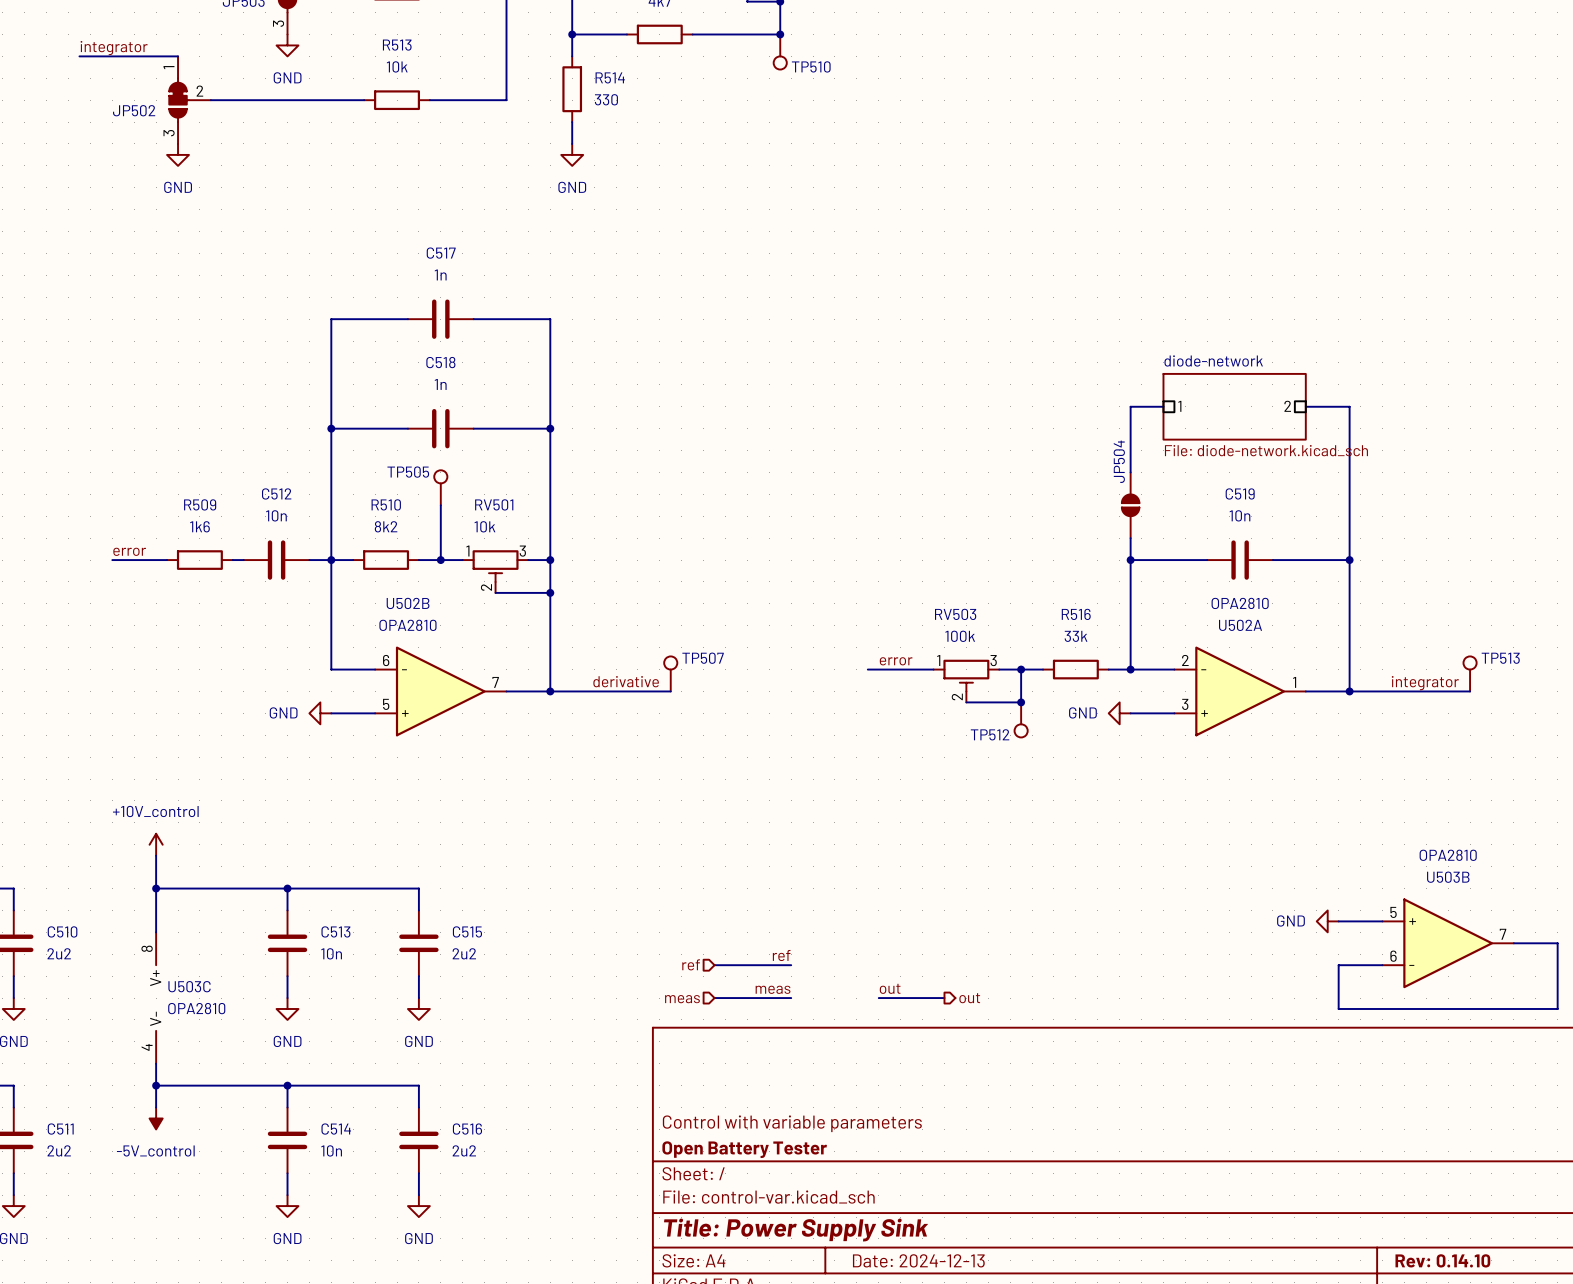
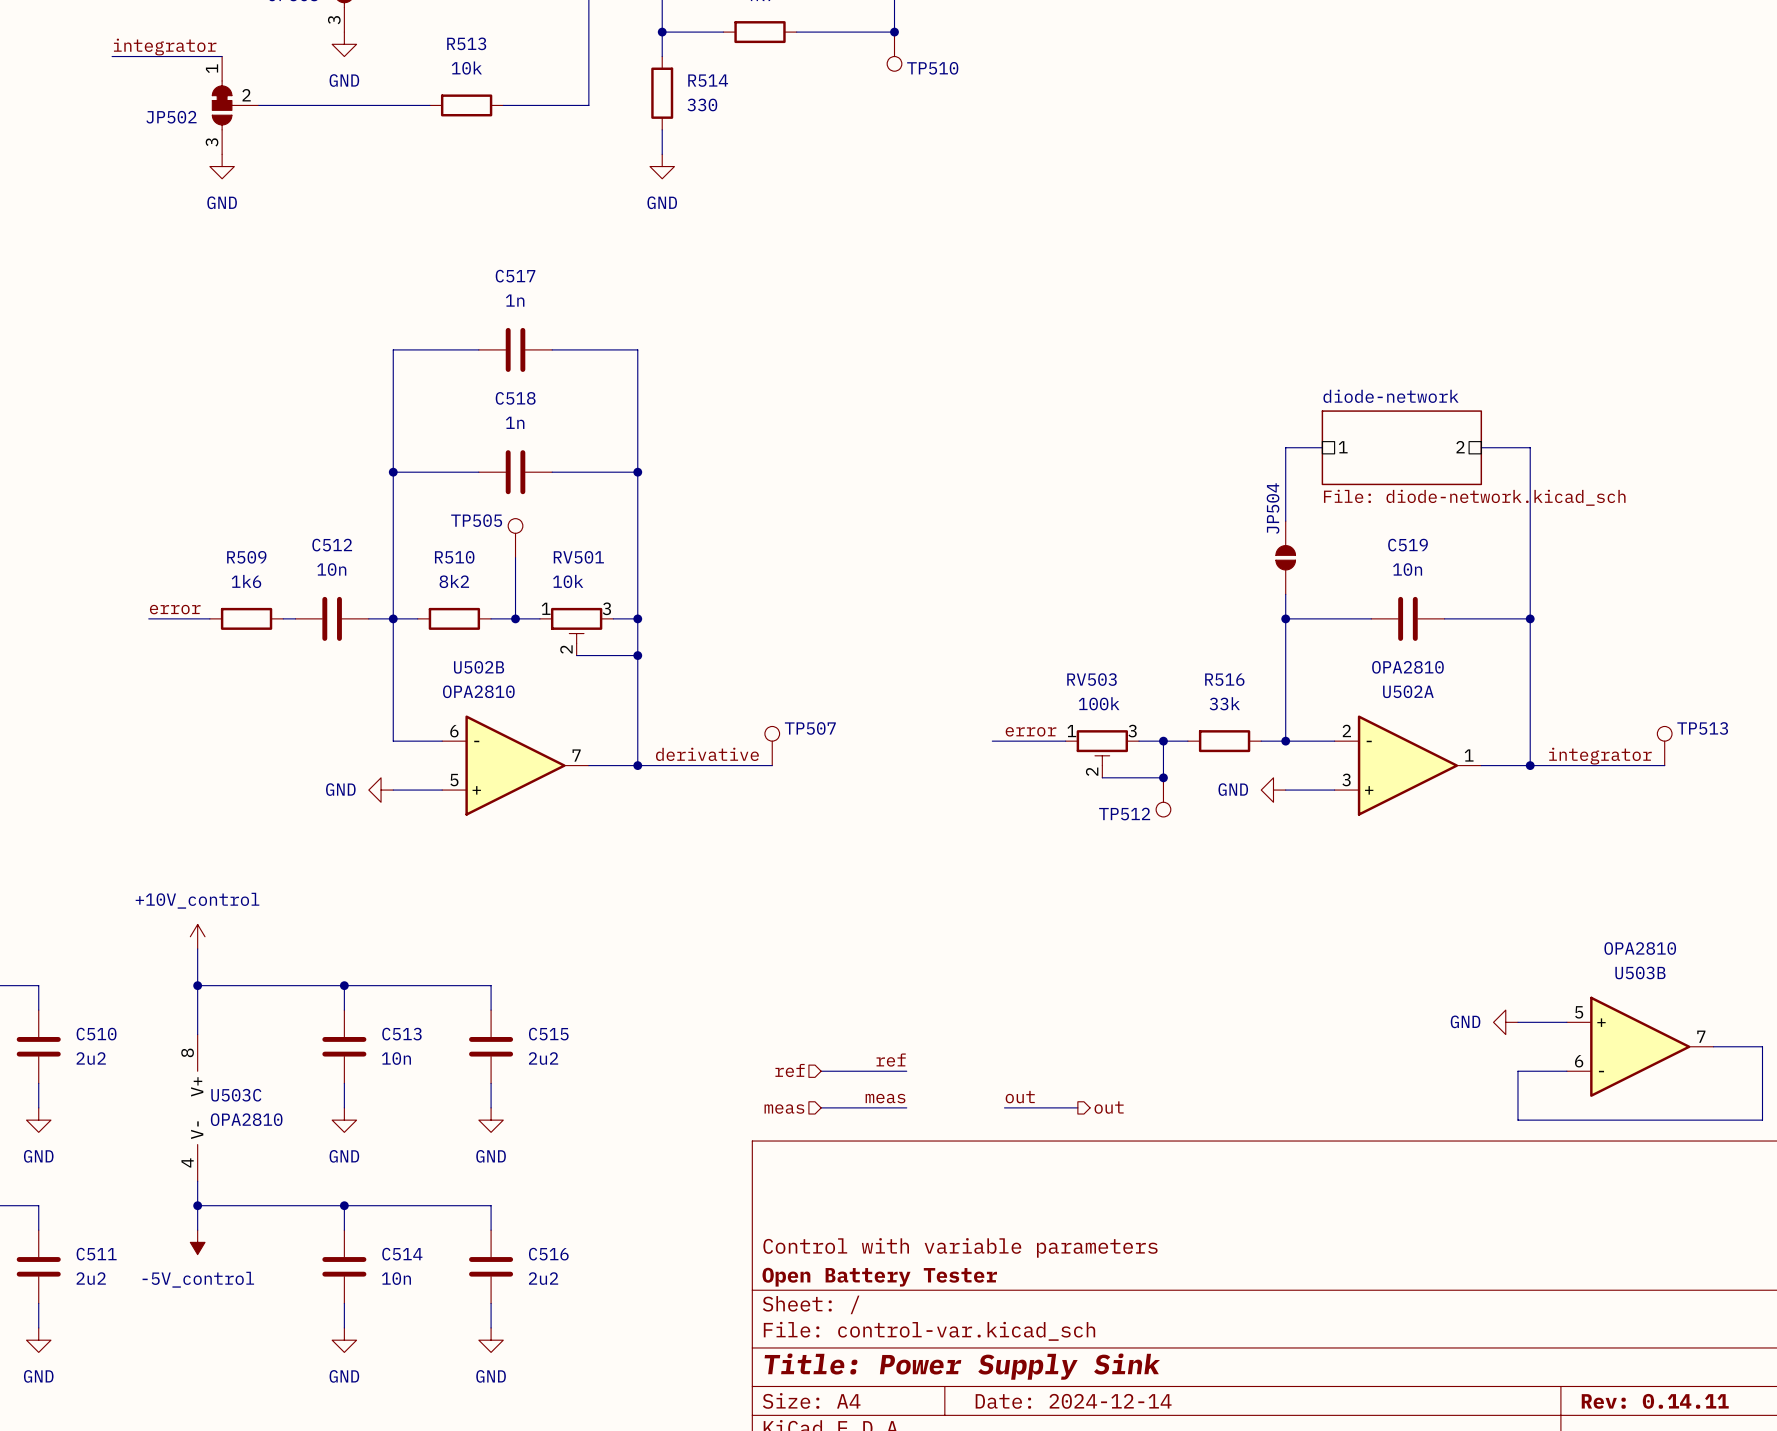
title block: Date: 2024-12-13 (918, 1260) -> Date: 2024-12-14 (1073, 1401)
title block: Rev: 0.14.10 (1442, 1260) -> Rev: 0.14.11 (1655, 1401)

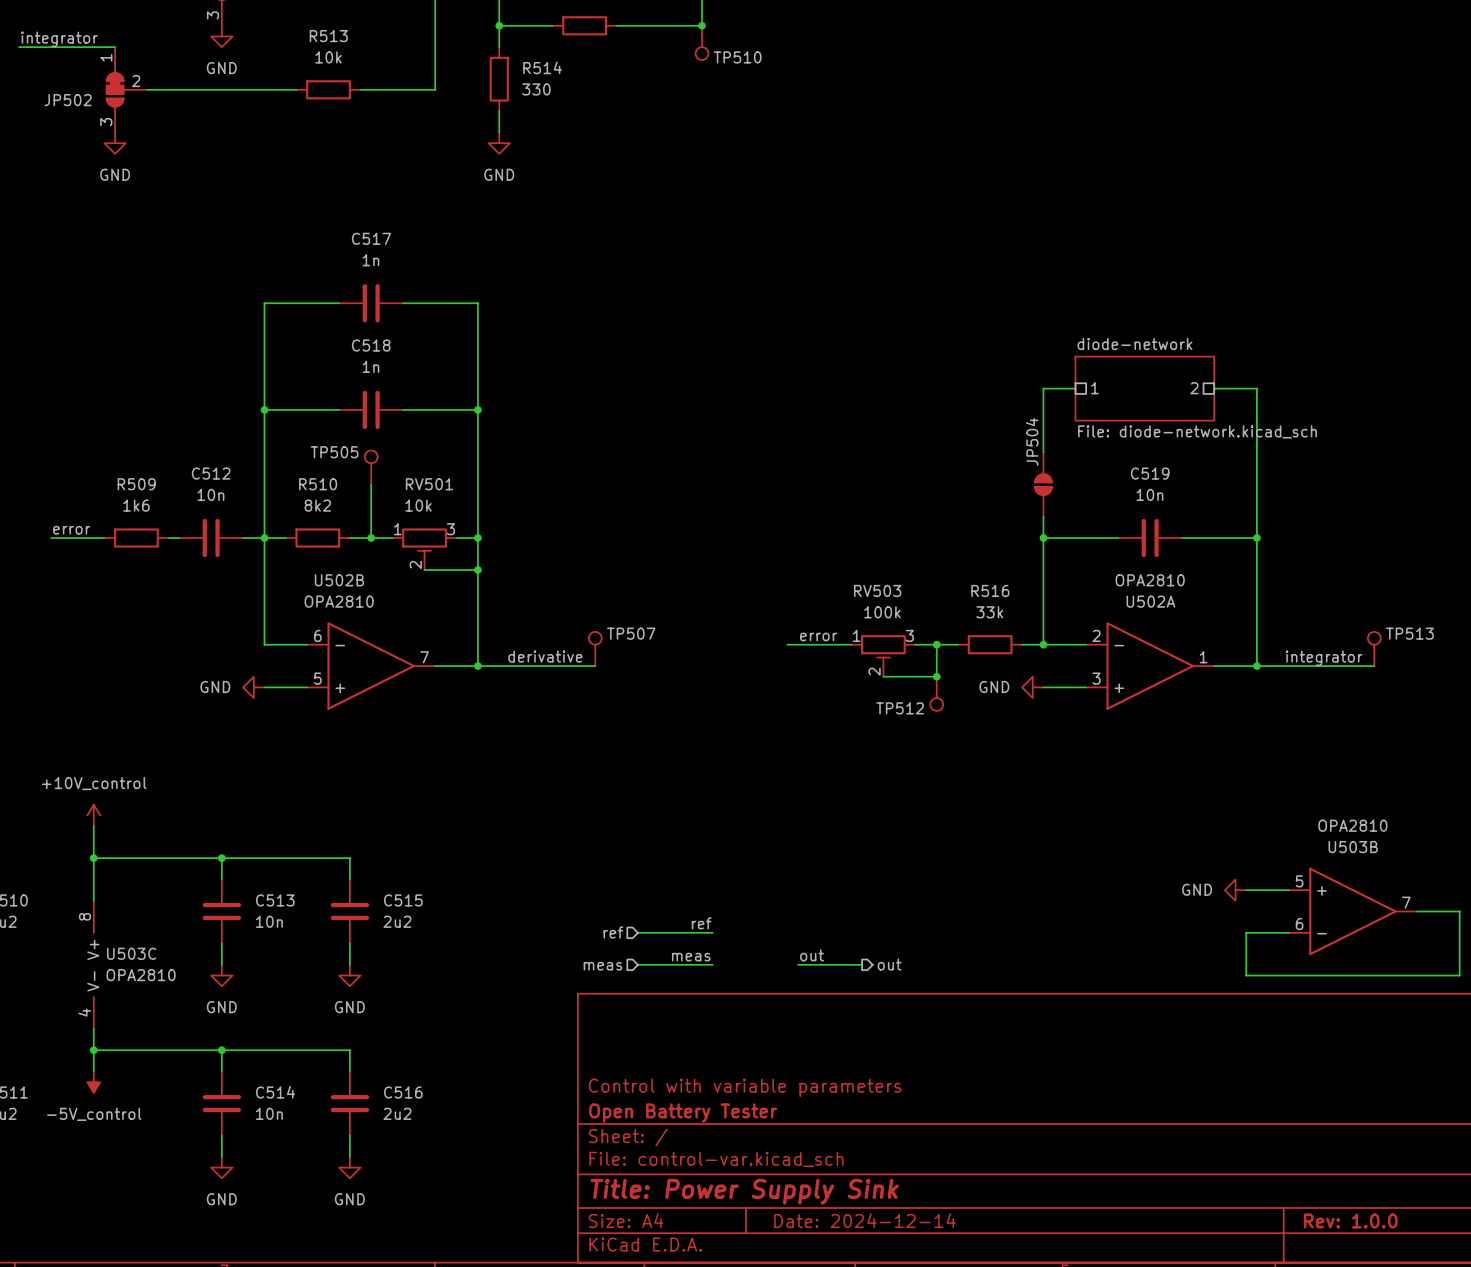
title block: Rev: 0.14.11 (1655, 1401) -> Rev: 1.0.0 (1350, 1220)

